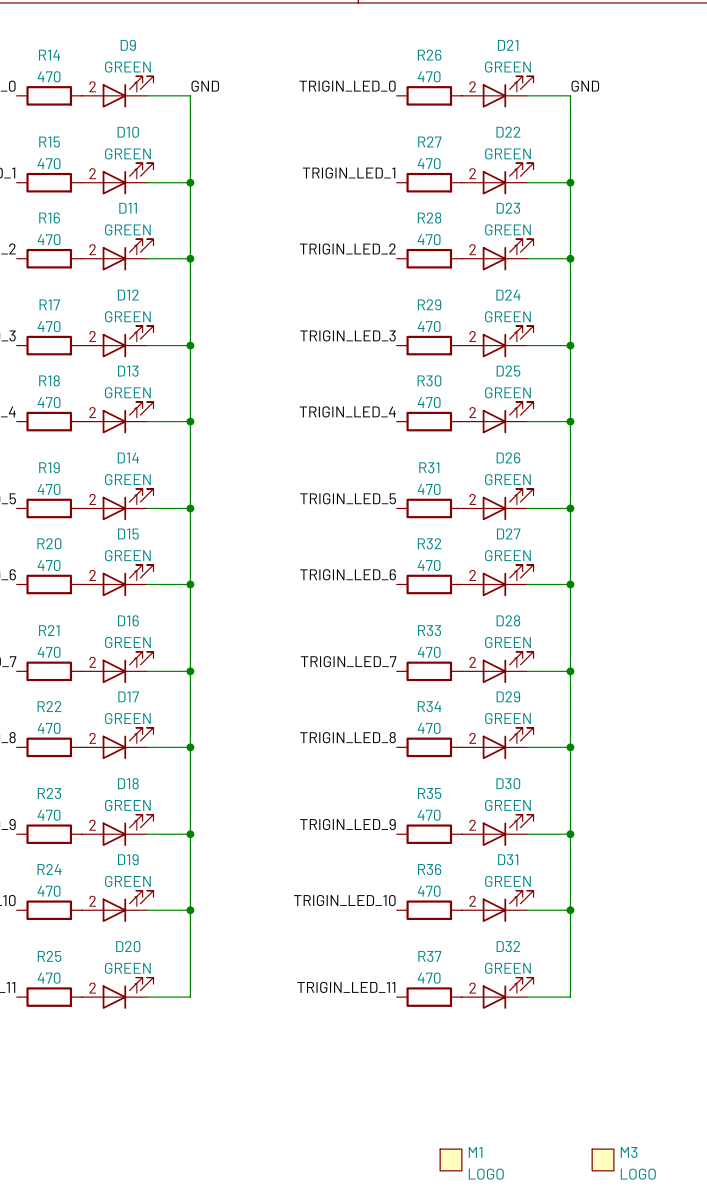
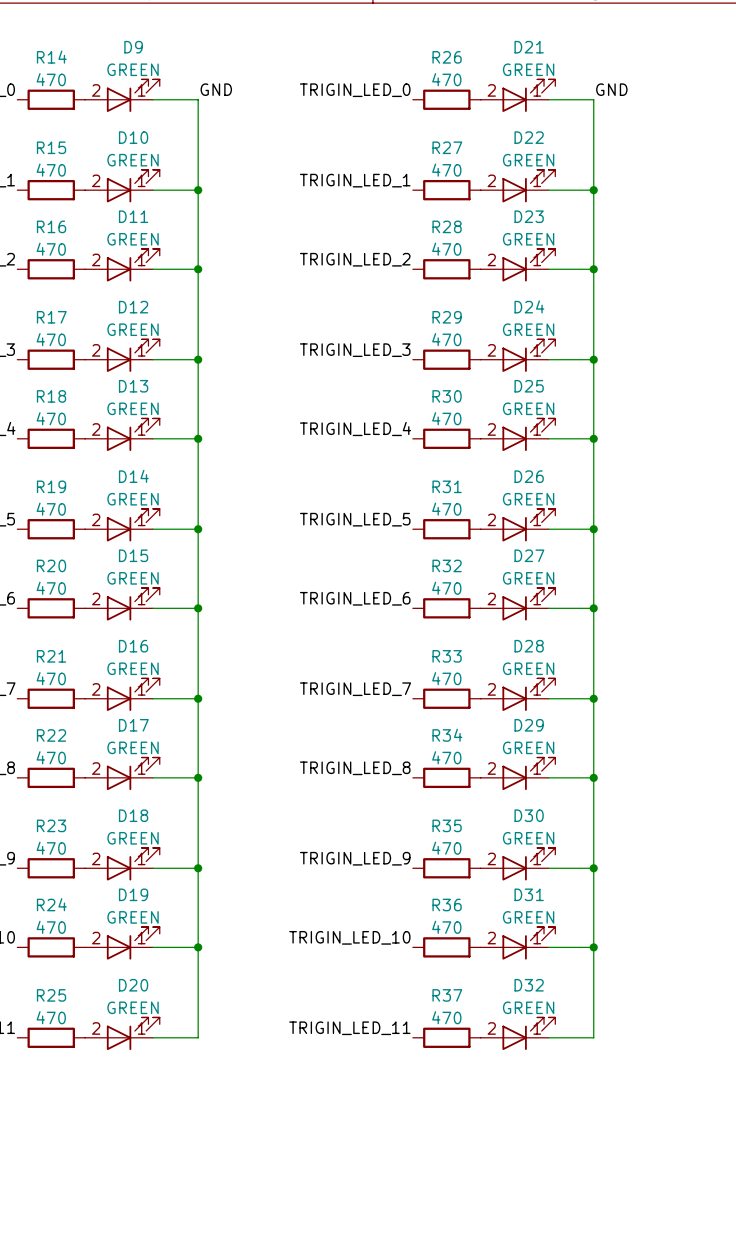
M1: LOGO (451, 1159) -> none
M3: LOGO (603, 1159) -> none

